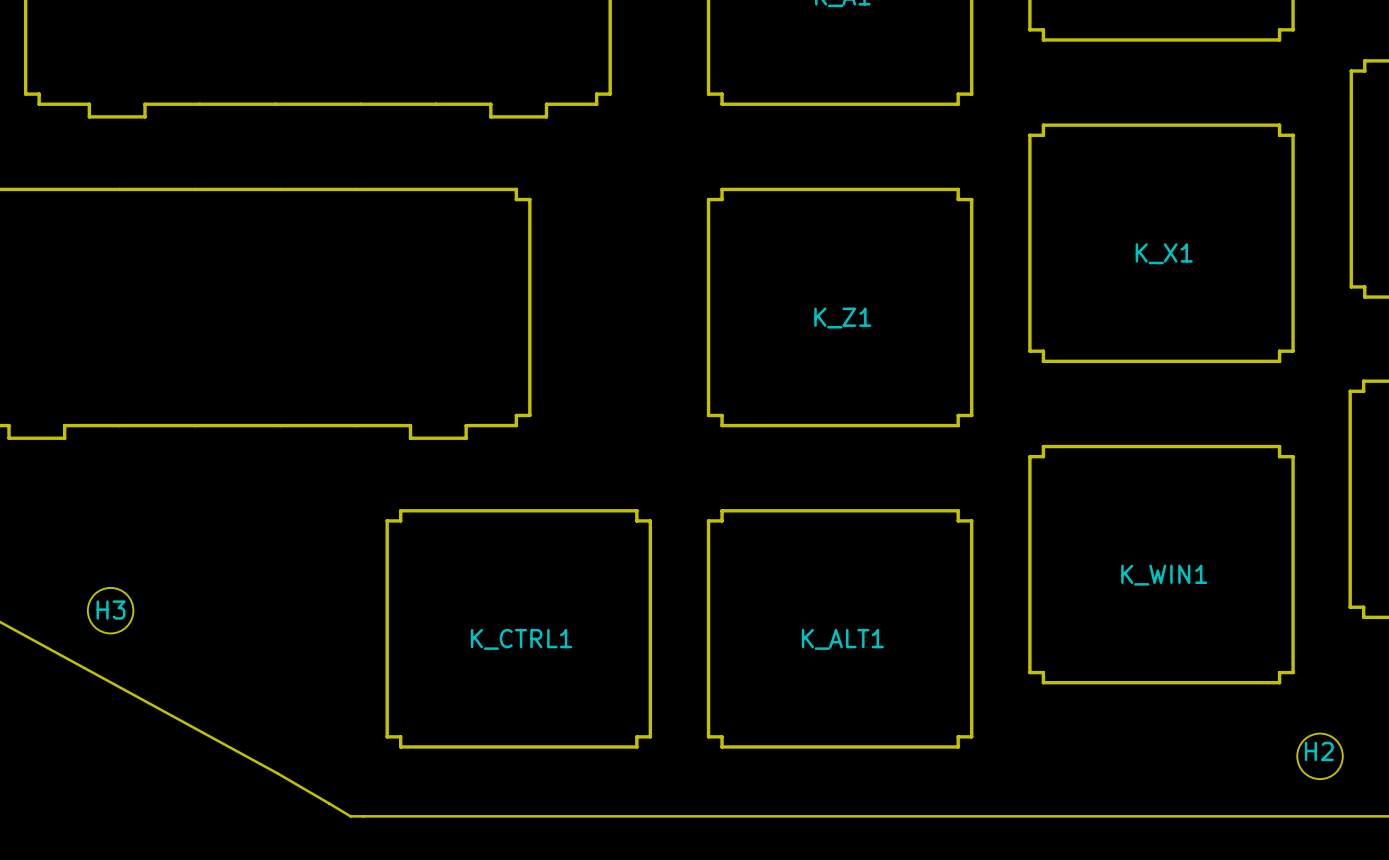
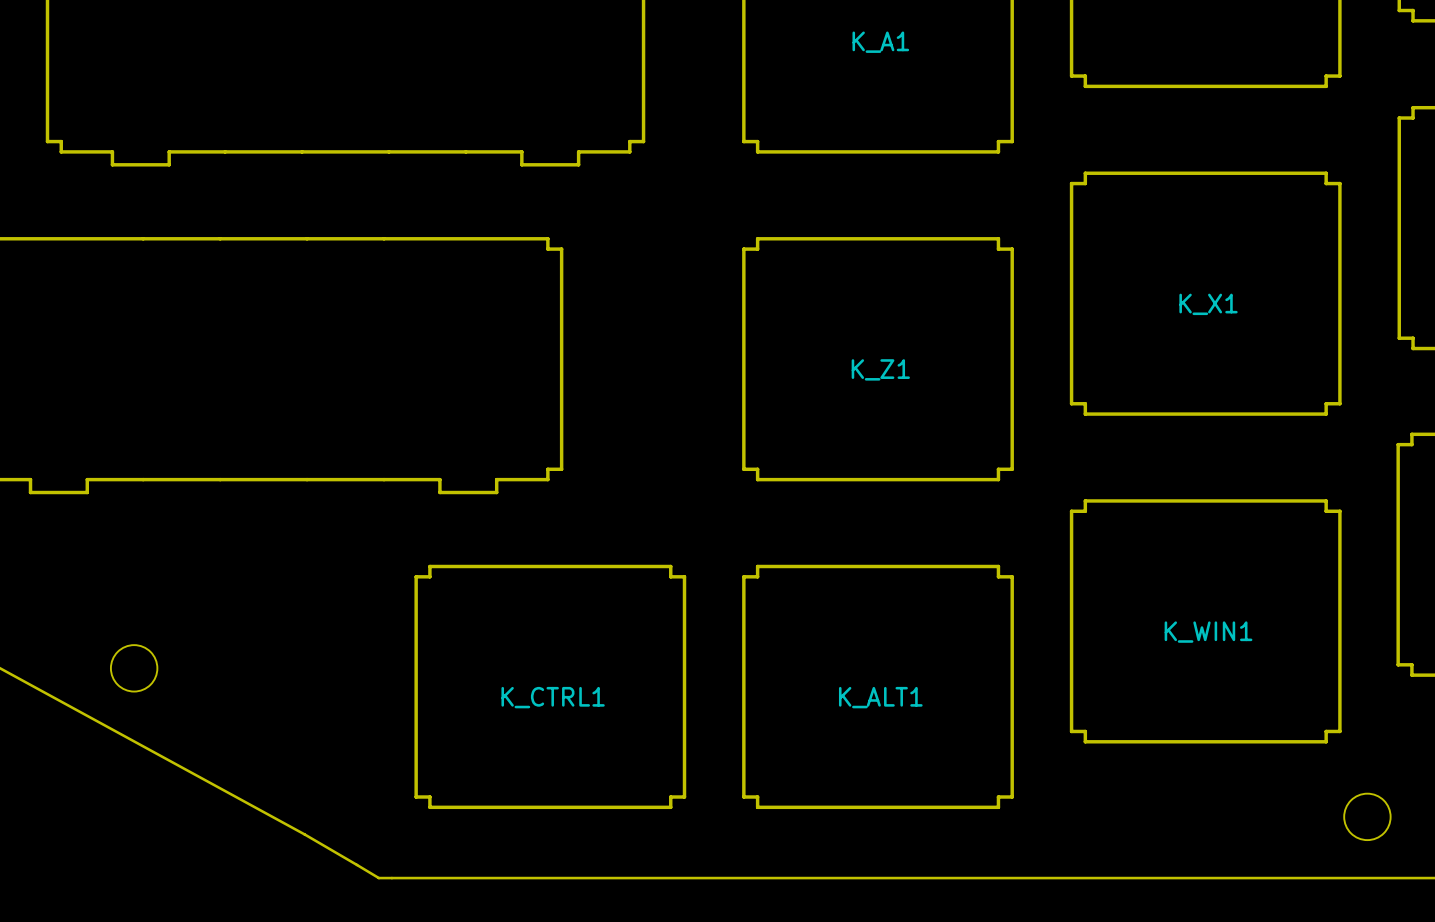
H3 name: H3 (111, 610) -> none
H2 name: H2 (1319, 751) -> none

